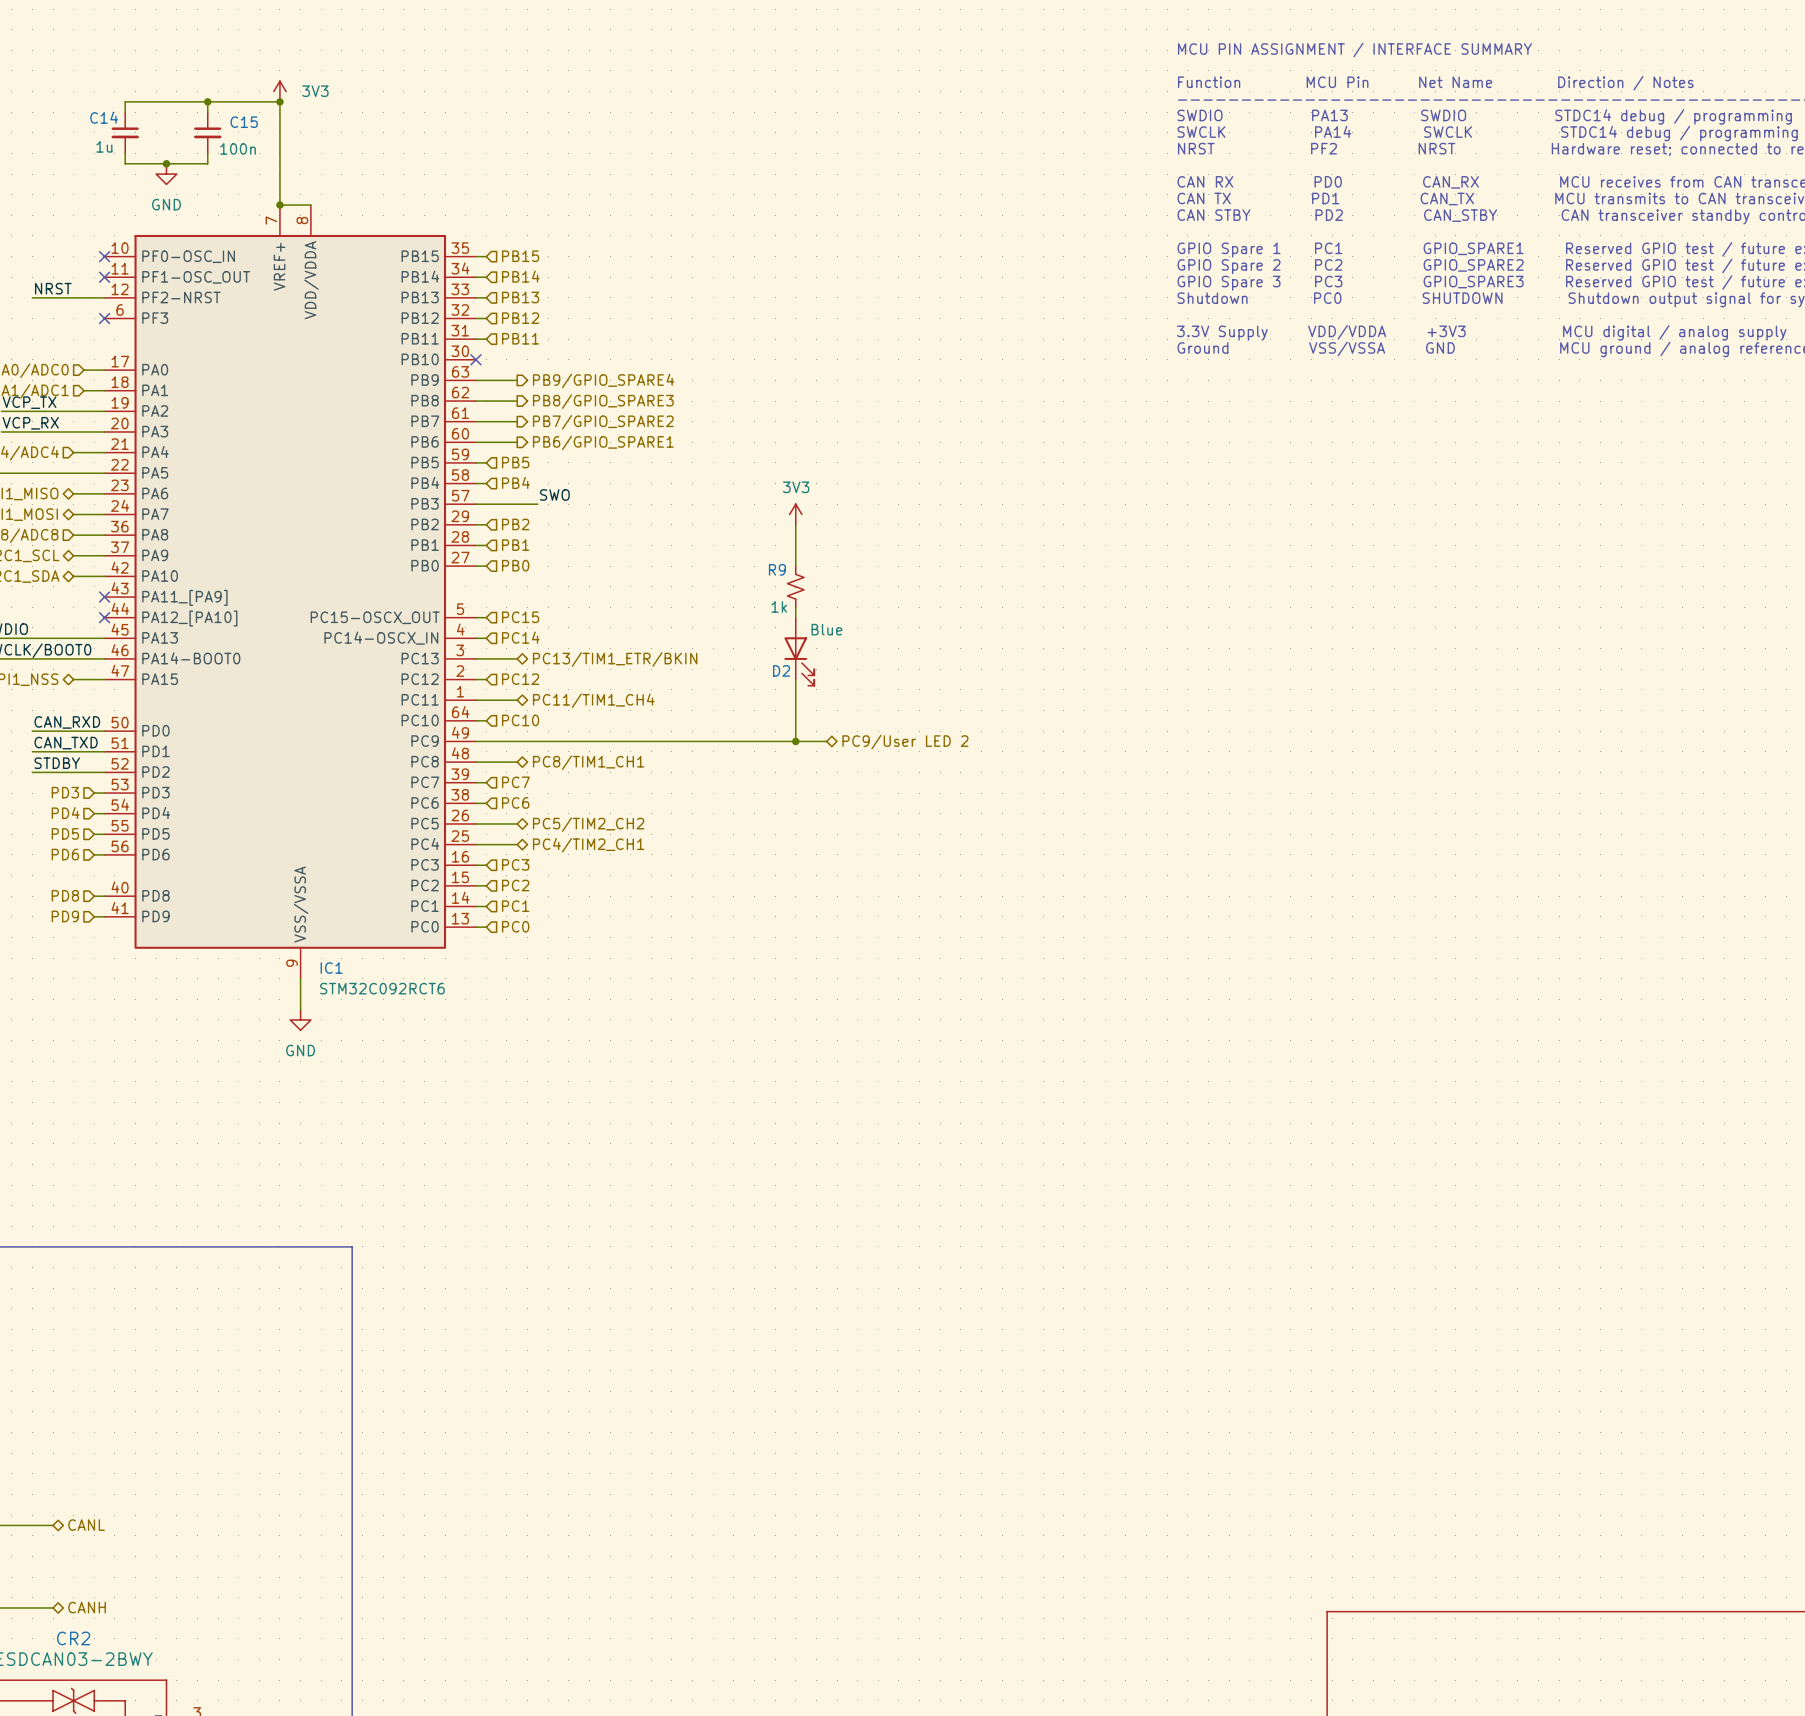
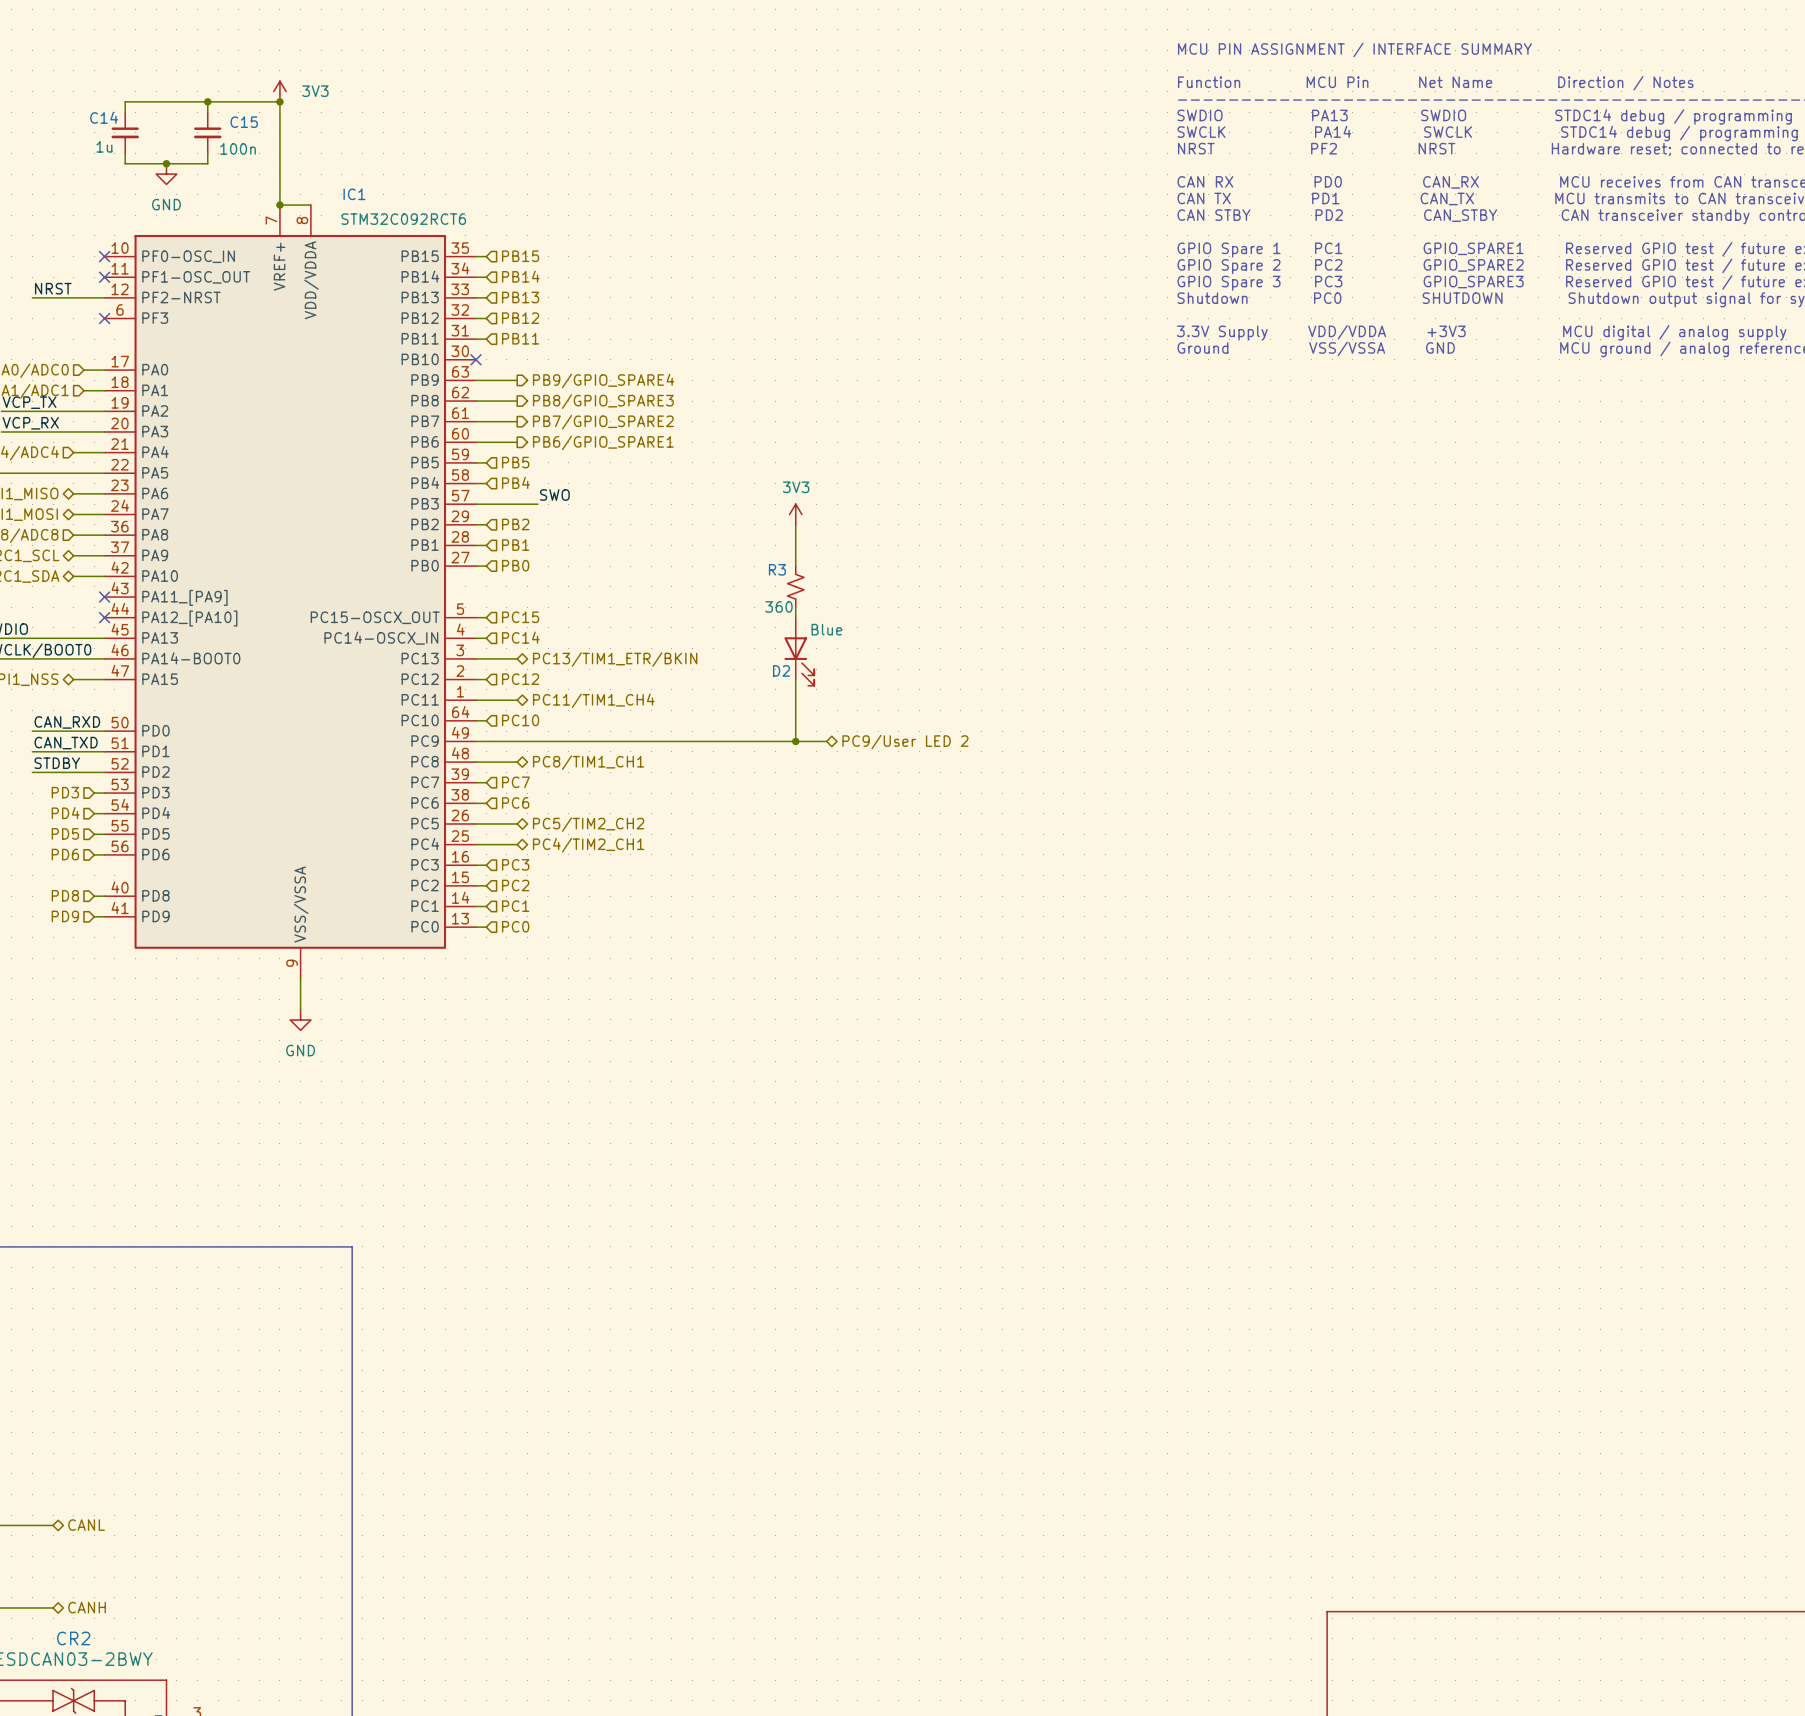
R9 name: R9 (777, 569) -> R3 (777, 569)
R9 value: 1k (779, 606) -> 360 (778, 606)
IC1 name position: IC1 (331, 968) -> IC1 (354, 194)
IC1 value position: STM32C092RCT6 (382, 988) -> STM32C092RCT6 (403, 219)

